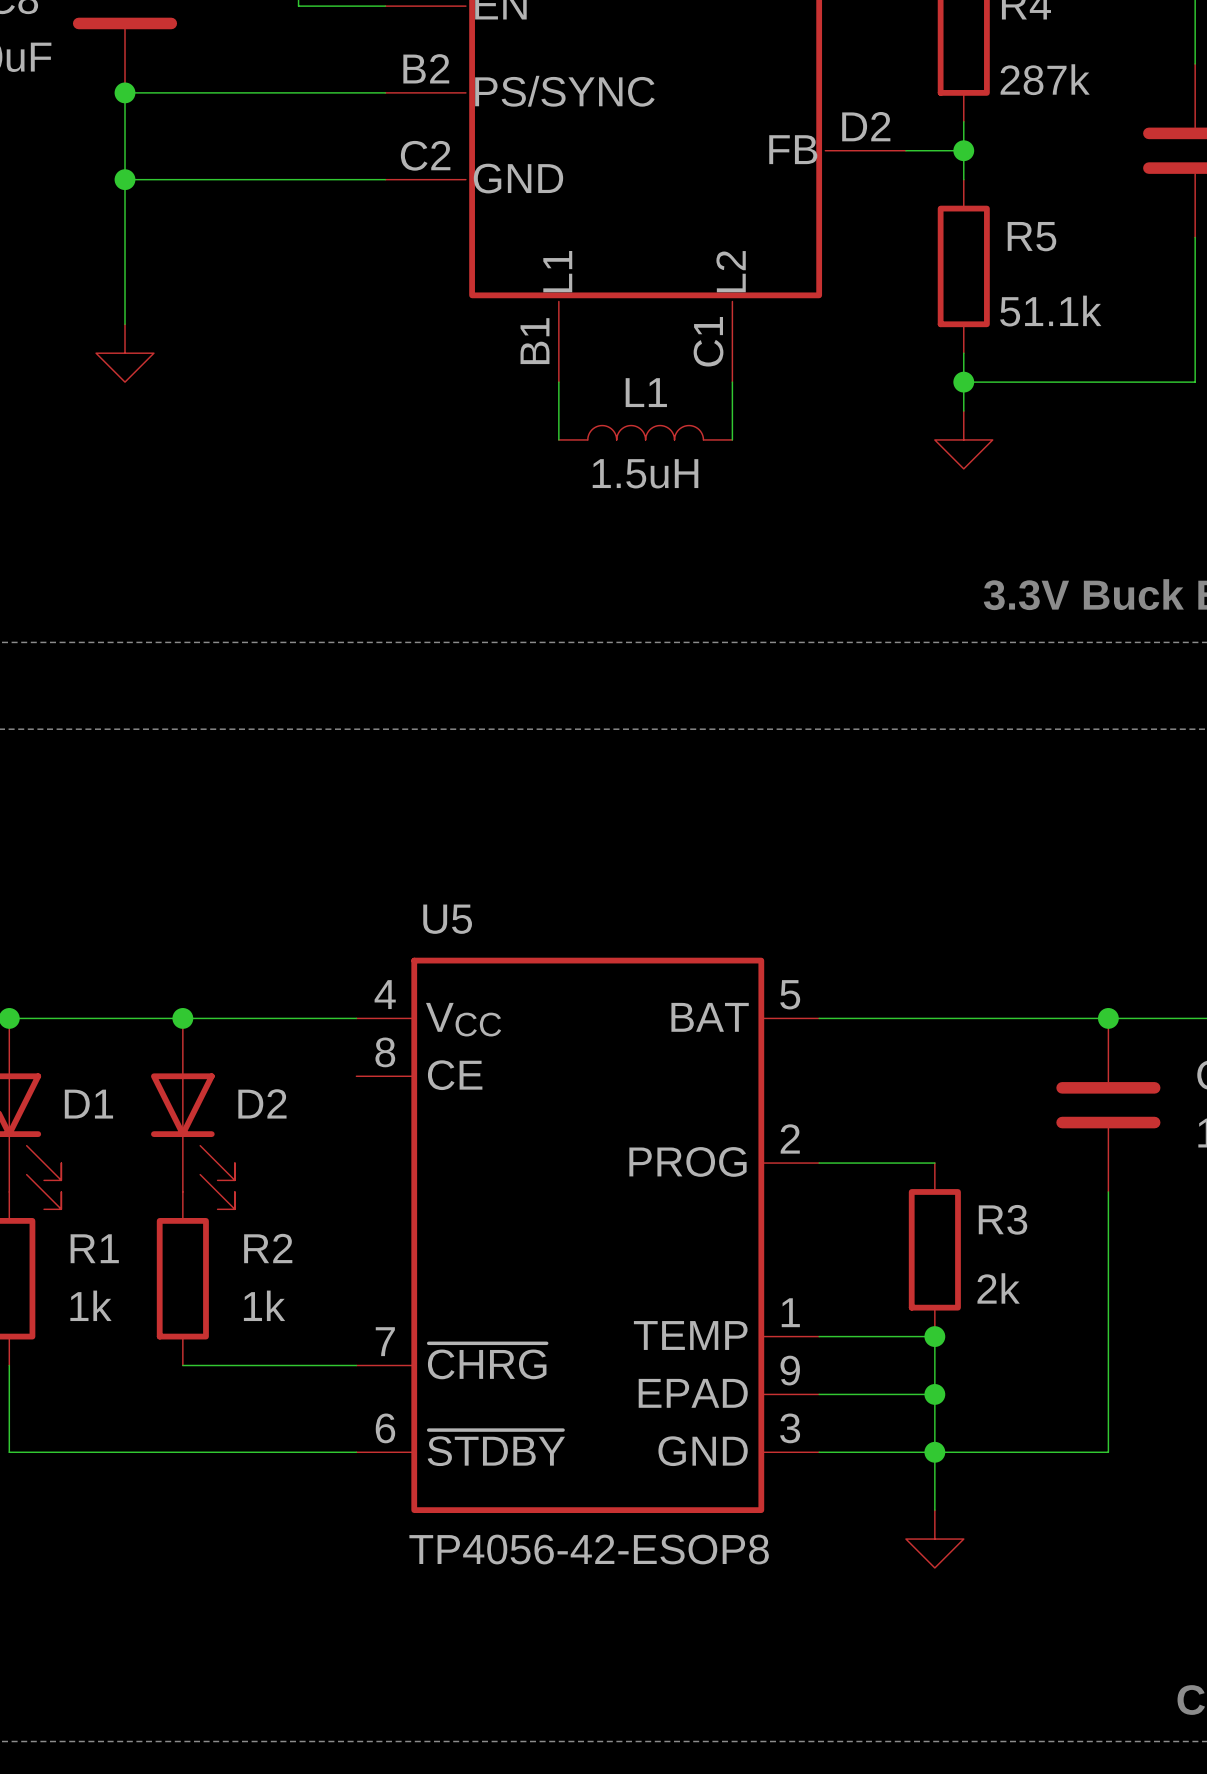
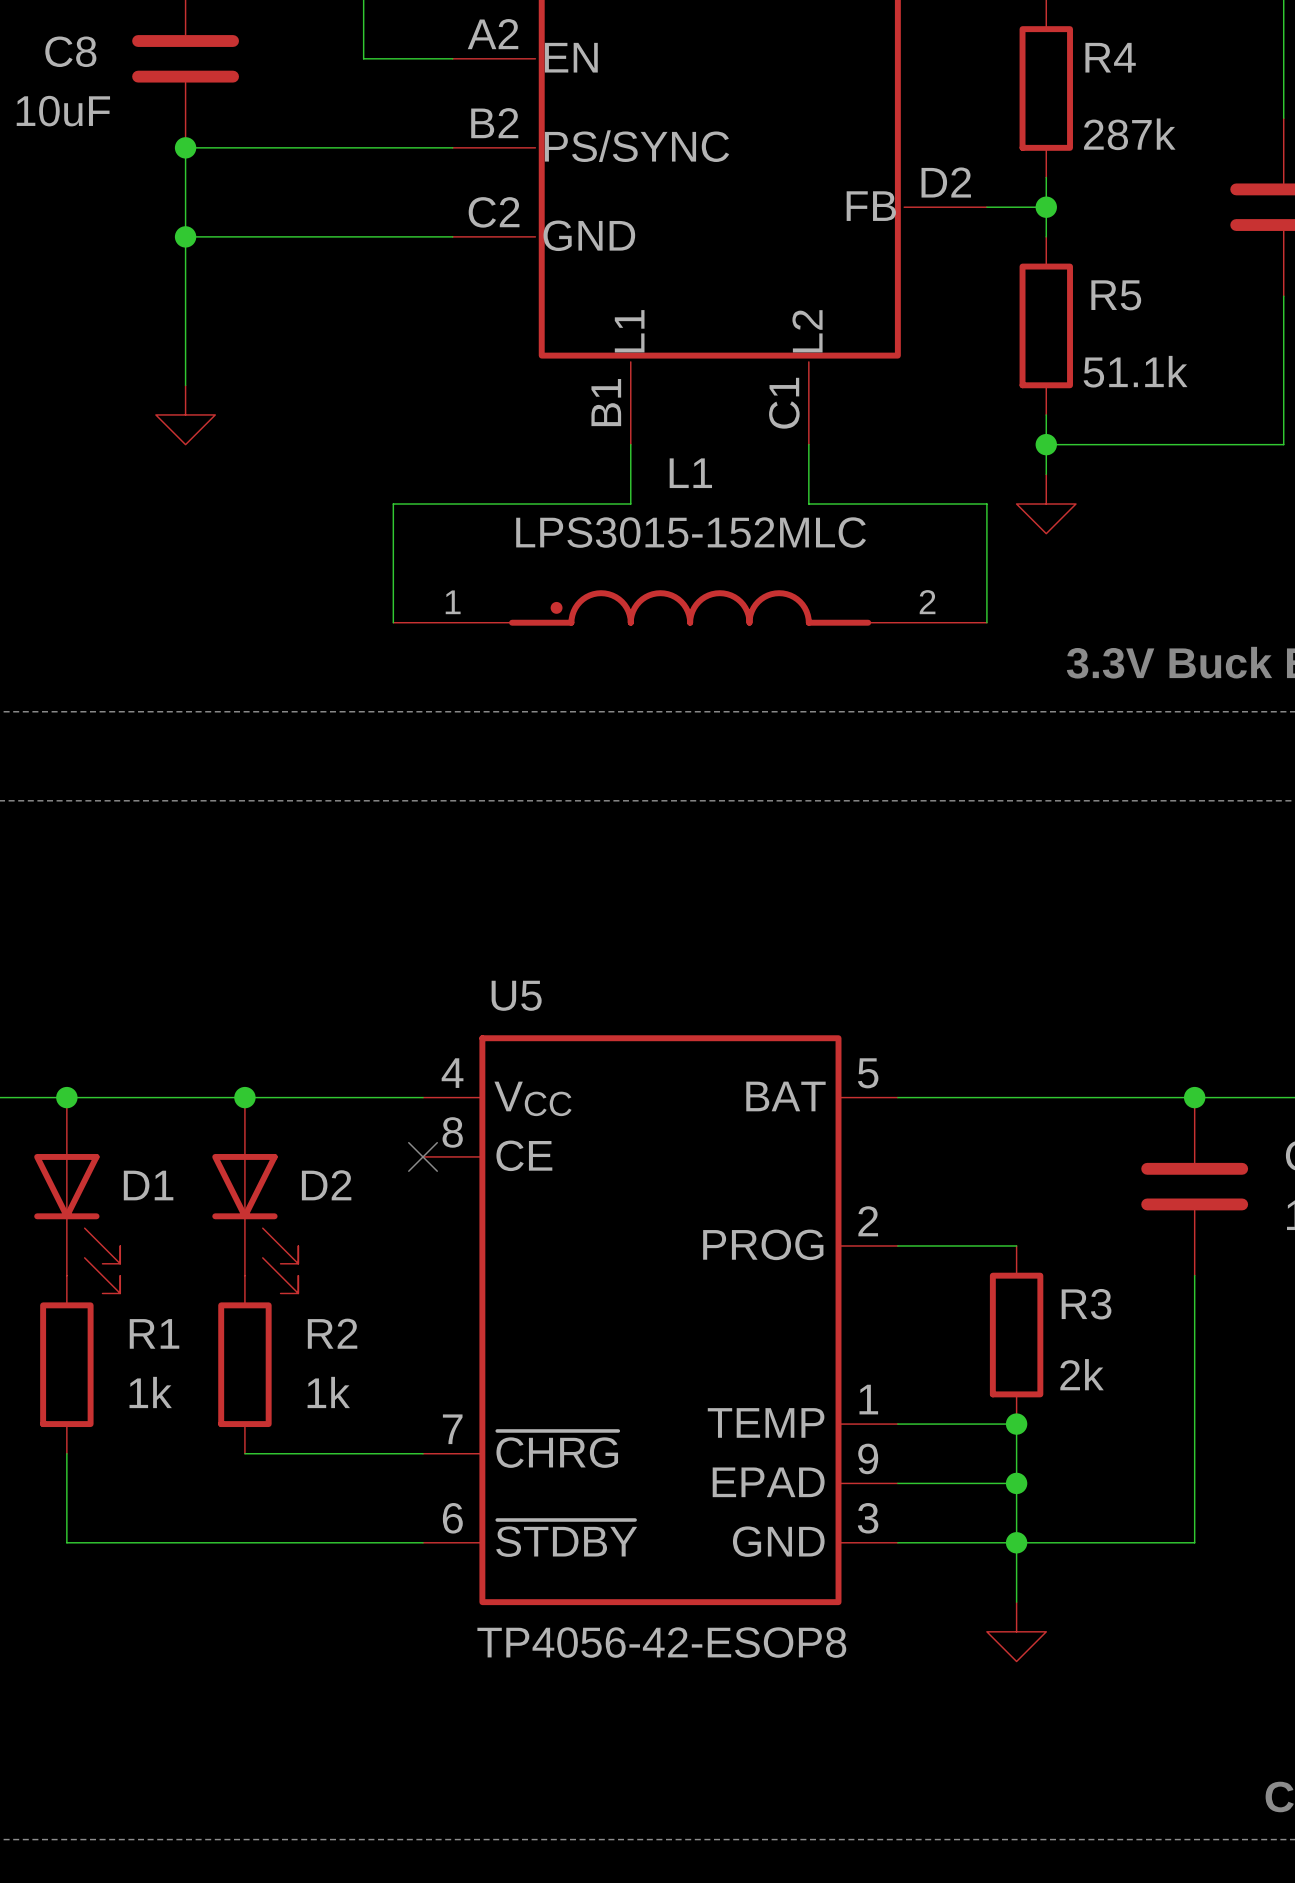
L1 name position: L1 (646, 392) -> L1 (690, 473)
L1 symbol: [558, 425, 733, 440] -> [393, 590, 987, 626]
wire: none -> (630, 504) (393, 504) (393, 622)
wire: none -> (808, 504) (986, 504) (986, 622)
L1 value: 1.5uH (645, 473) -> LPS3015-152MLC (691, 532)
no-connect mark: none -> (423, 1156)

